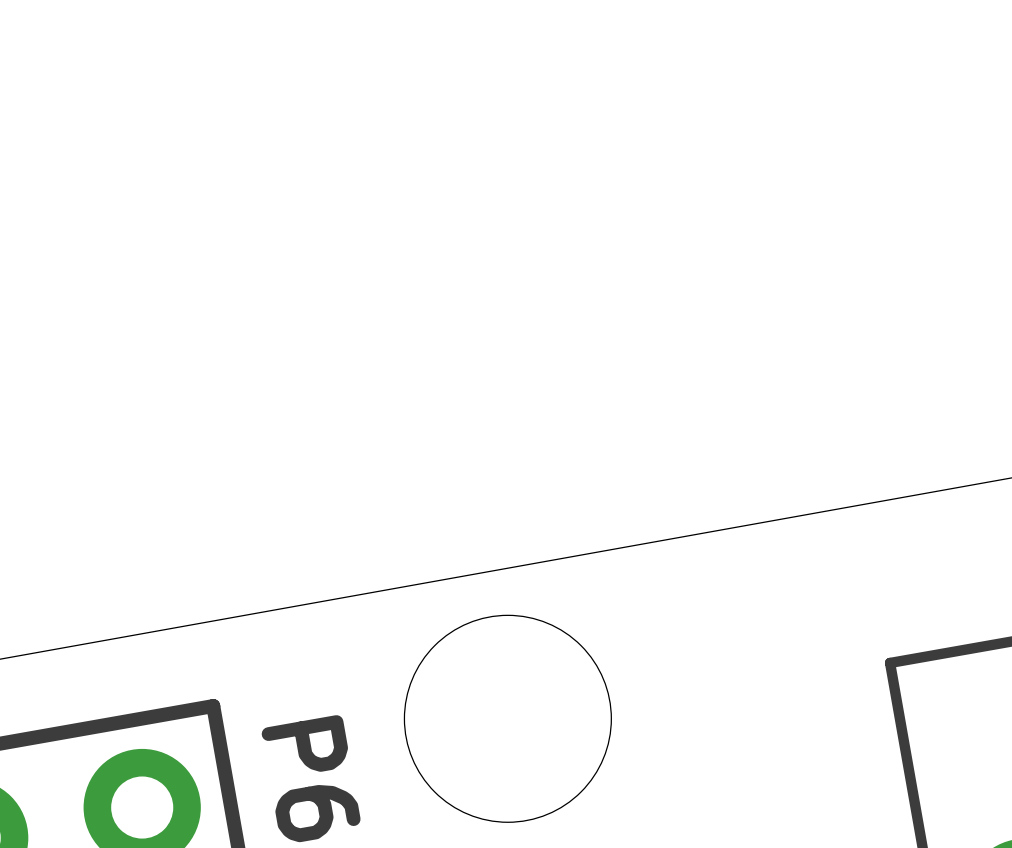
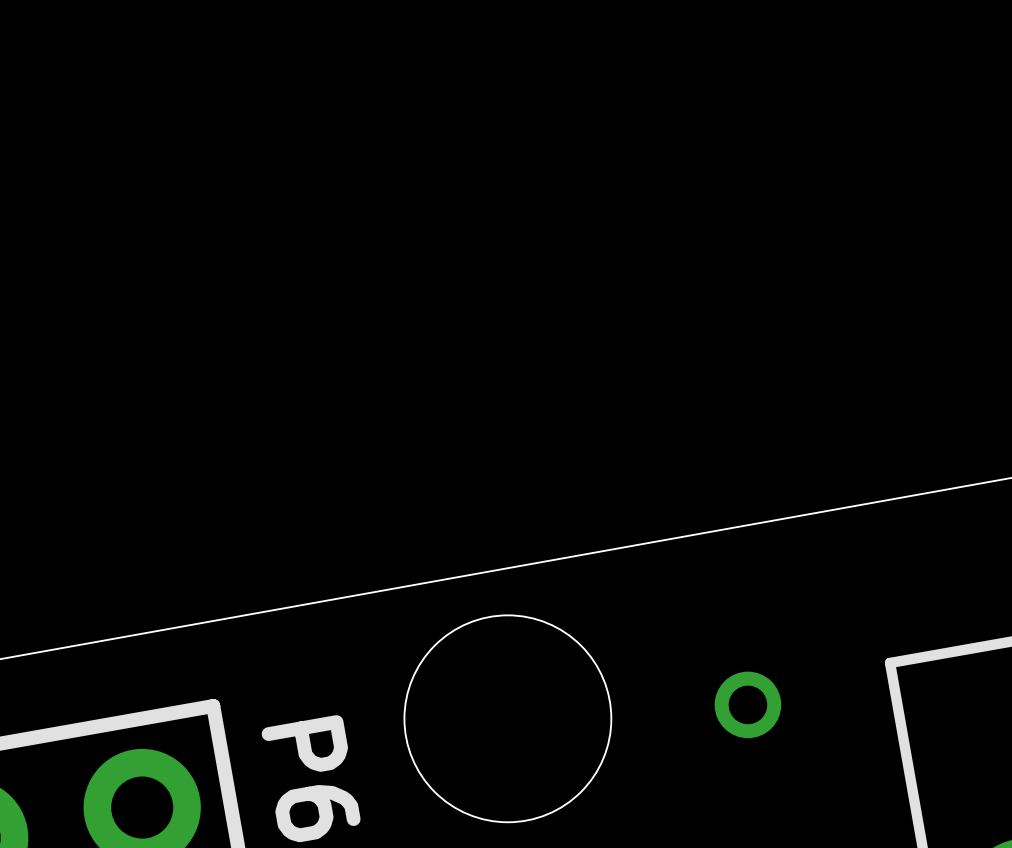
part: none -> (747, 704)

